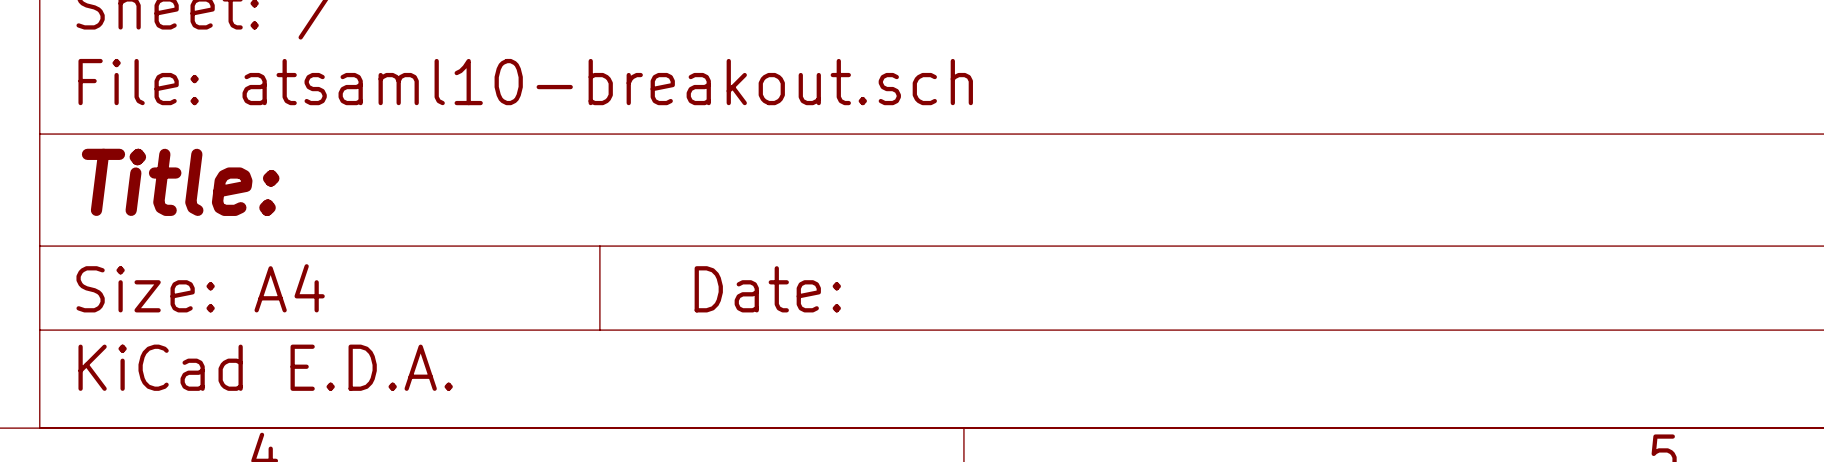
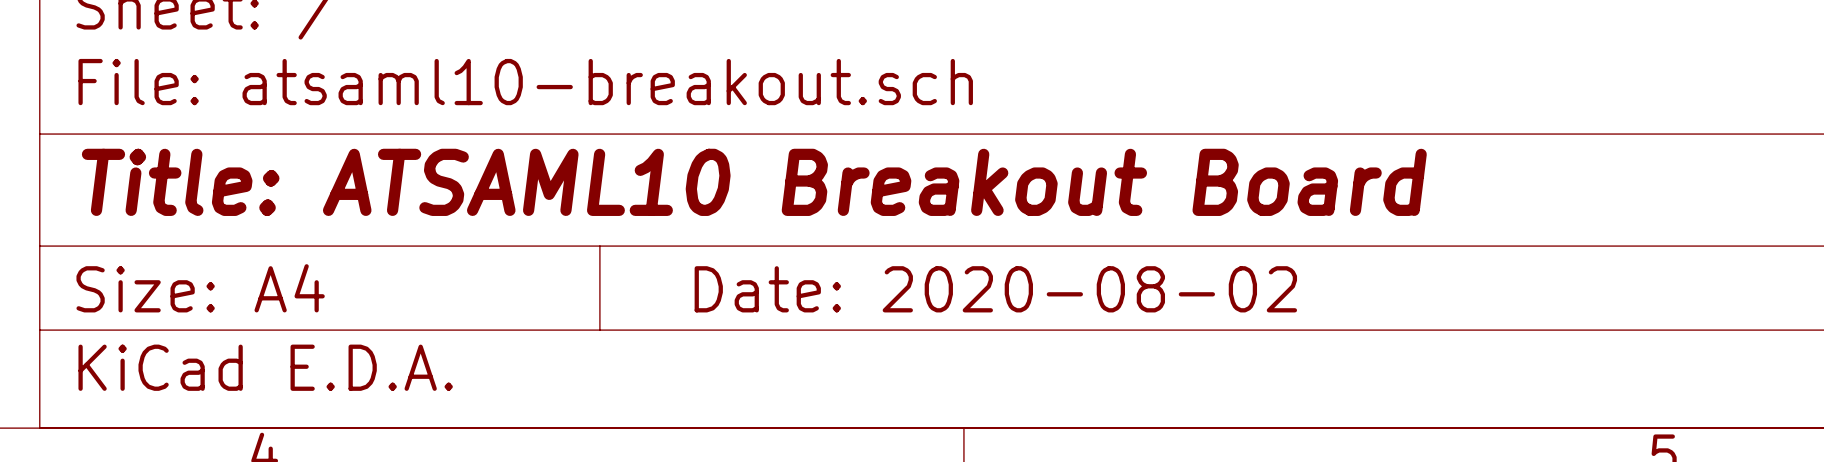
title block: Title: (180, 182) -> Title: ATSAML10 Breakout Board (754, 182)
title block: Date: (767, 289) -> Date: 2020-08-02 (995, 289)

